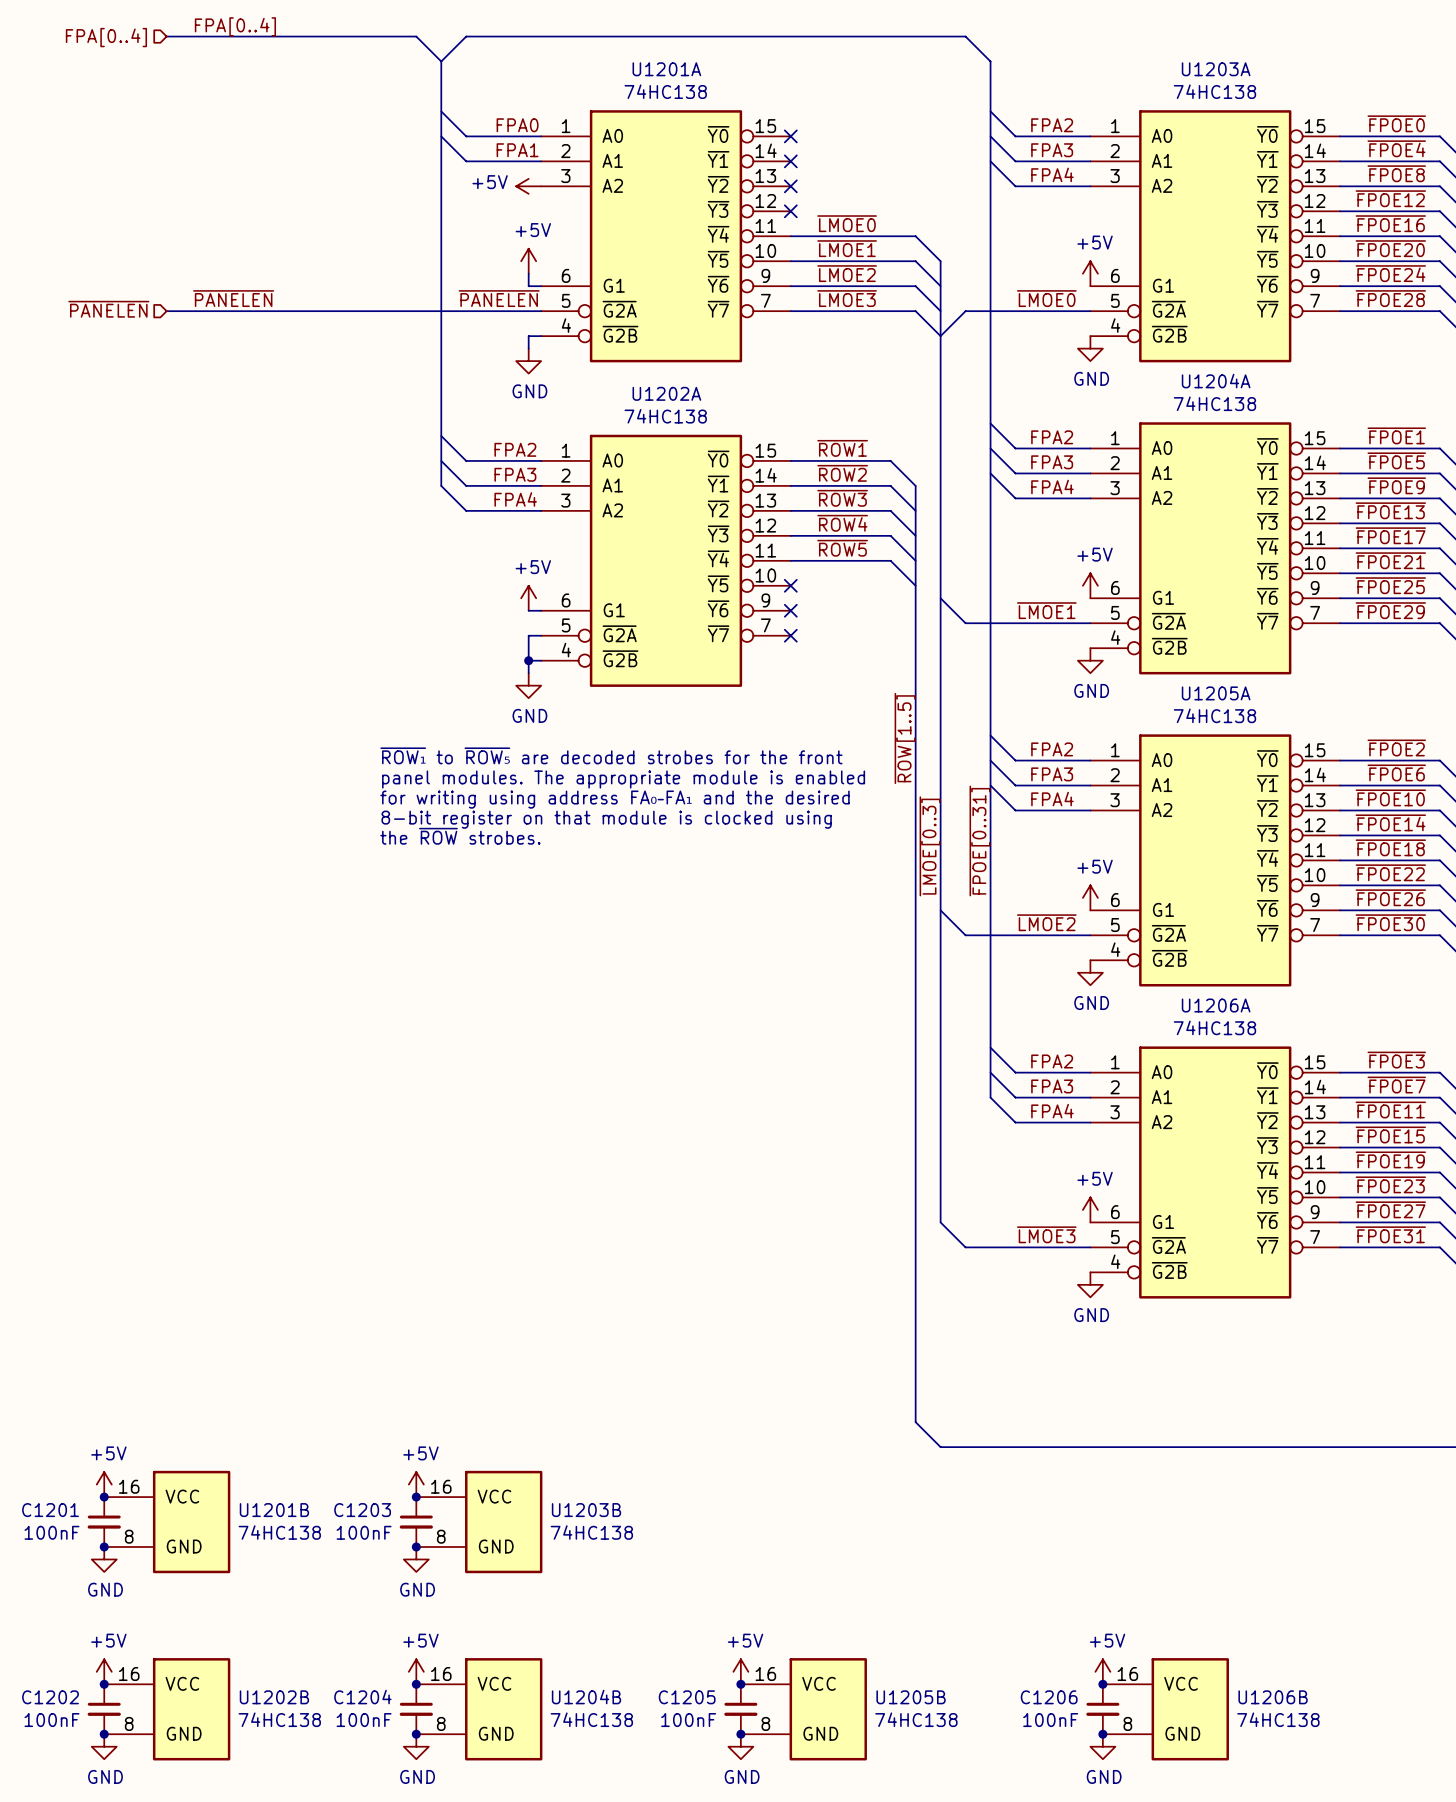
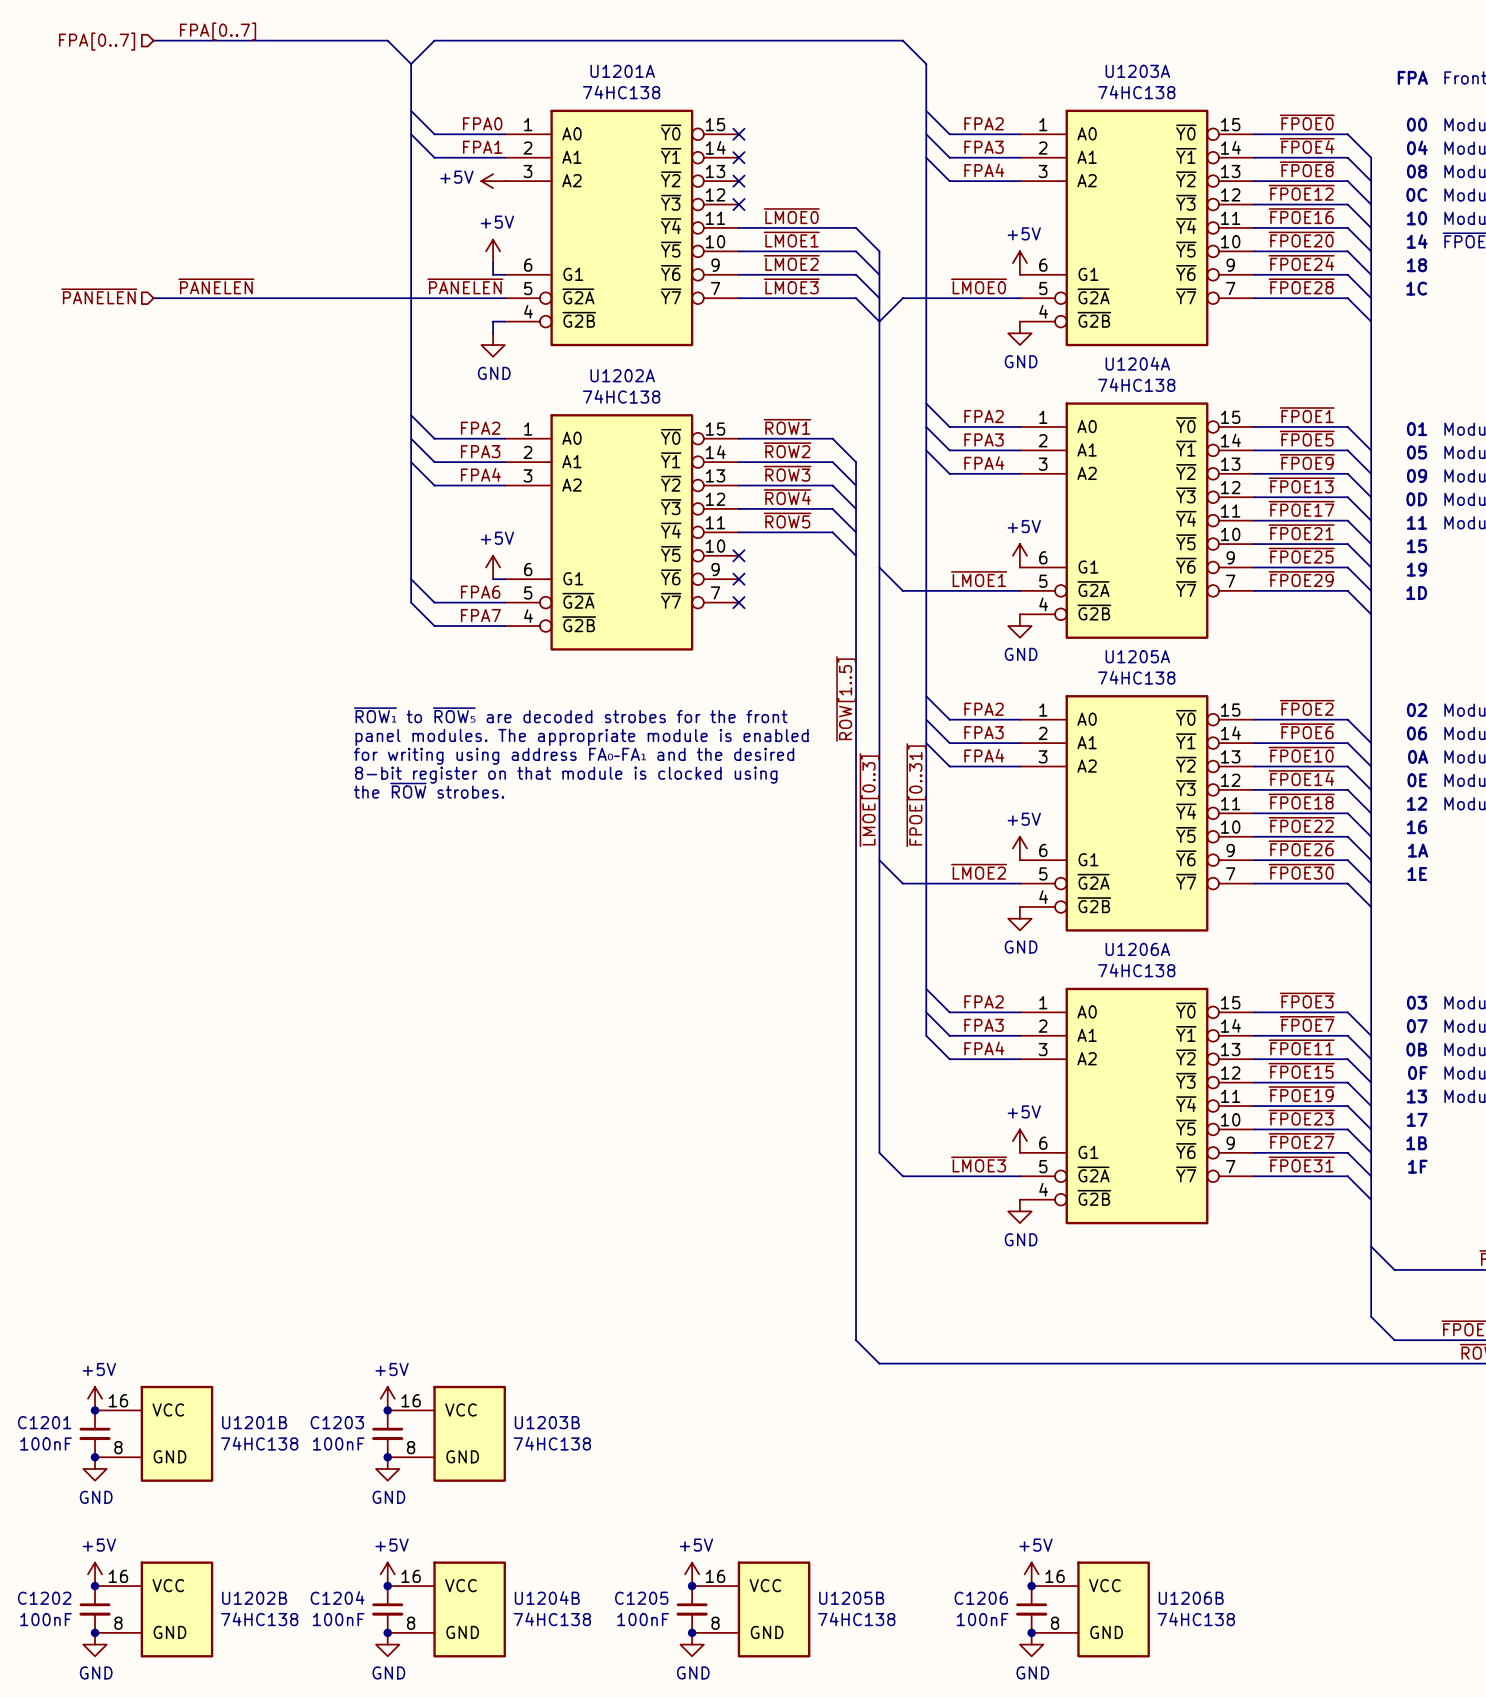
label: FPA[0..4] (235, 26) -> FPA[0..7] (218, 31)
hierarchical label: FPA[0..4] (106, 37) -> FPA[0..7] (97, 41)
bus: none -> (411, 462) (411, 602)
label: none -> FPA6 (480, 592)
wire: none -> (411, 602) (434, 626) (493, 626)
wire: (528, 635) (528, 673) -> (493, 602) (434, 602) (411, 579)
label: none -> FPA7 (480, 615)
junction: (528, 660) -> none
power symbol: GND (528, 685) -> none

